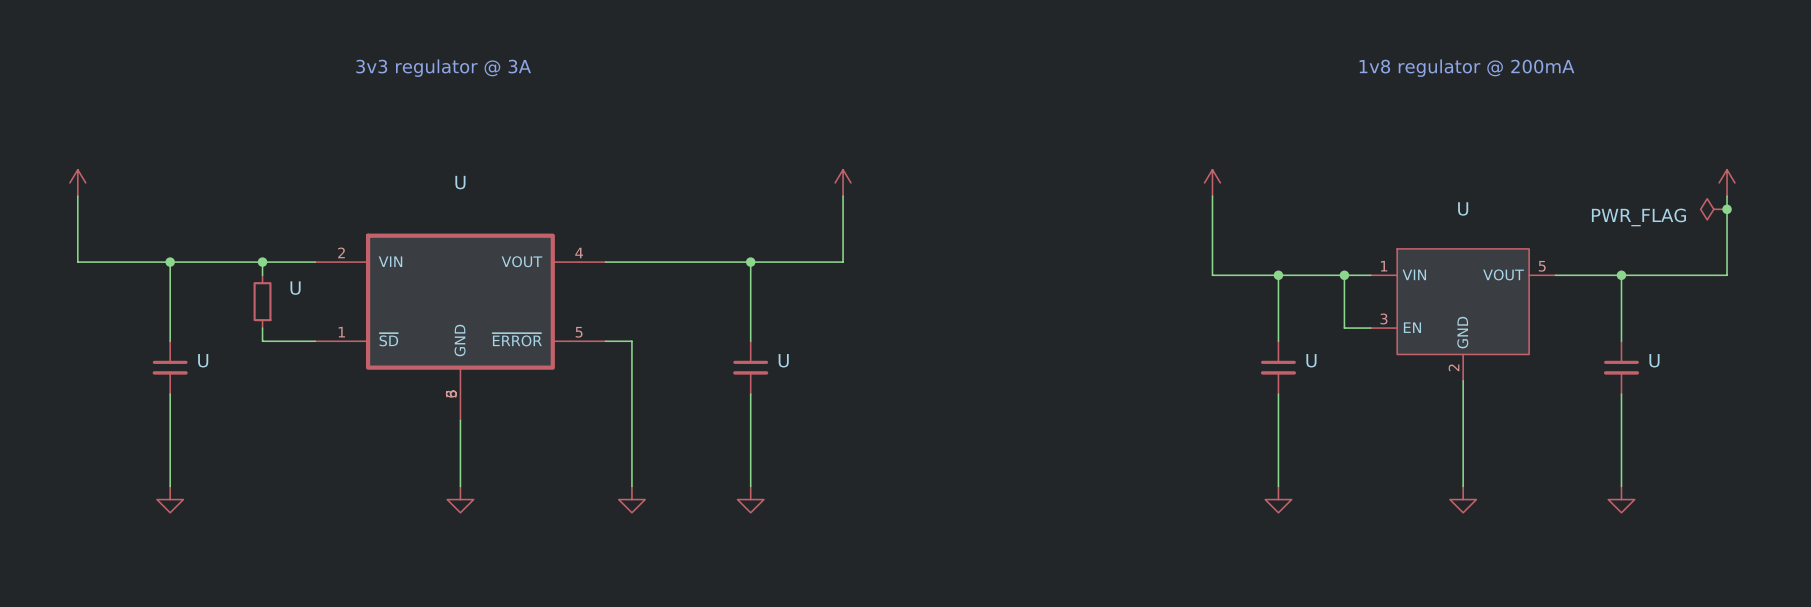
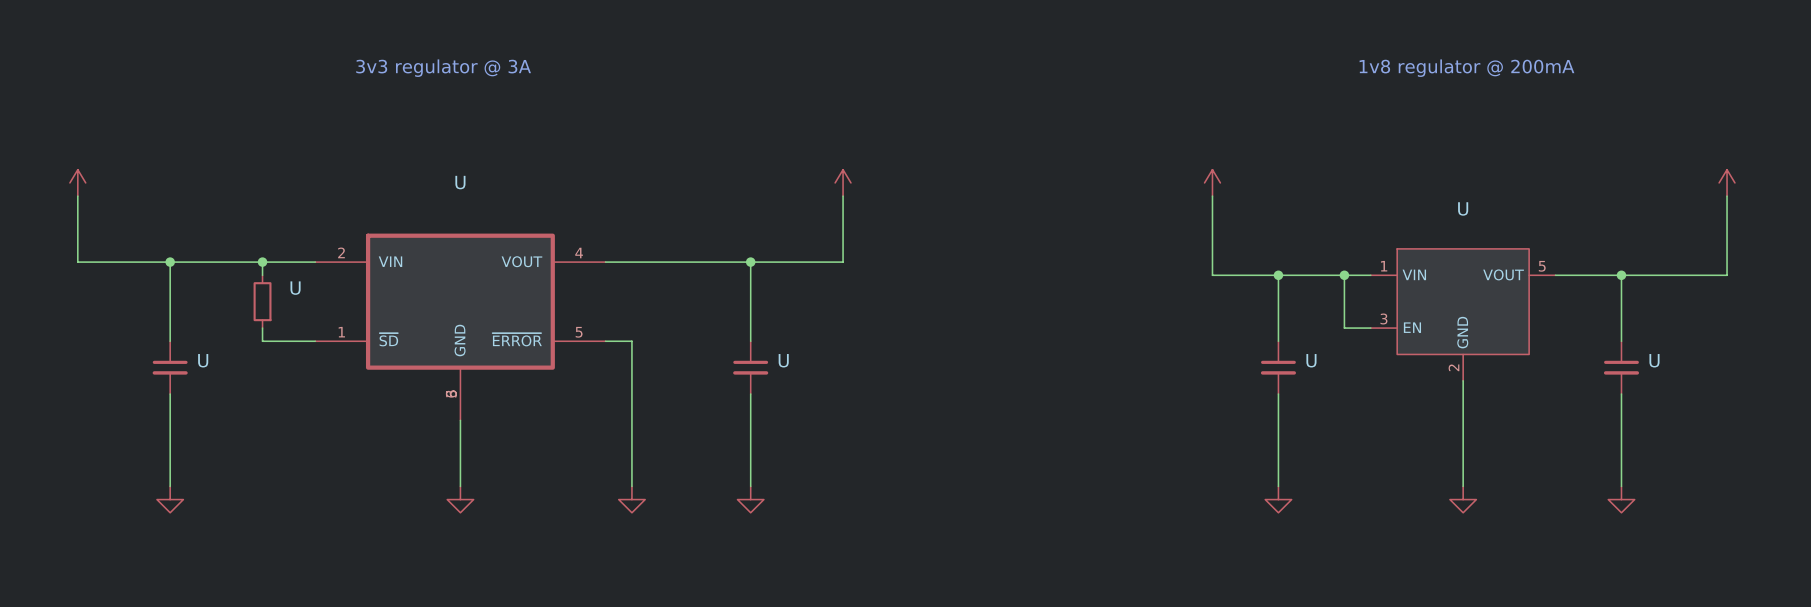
power symbol: PWR_FLAG (1713, 209) -> none
junction: (1727, 209) -> none

